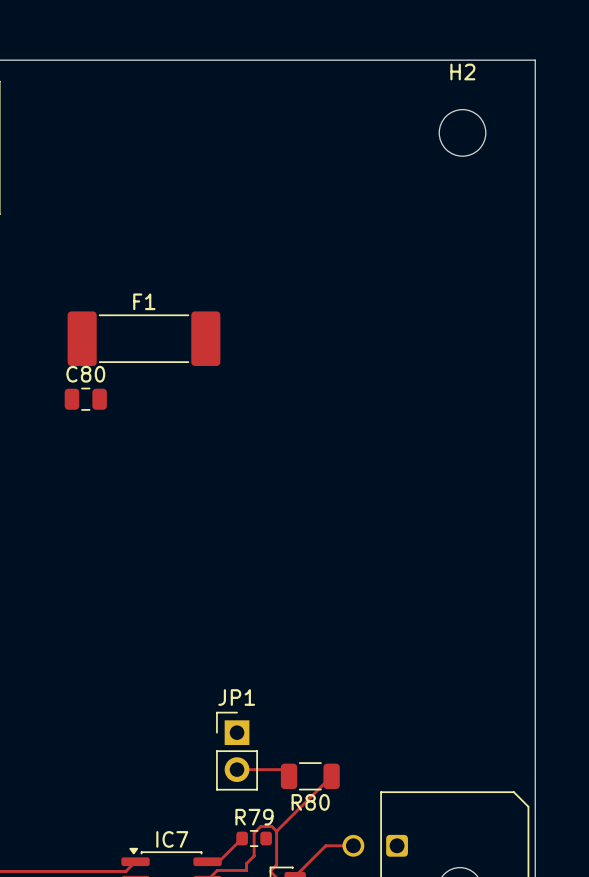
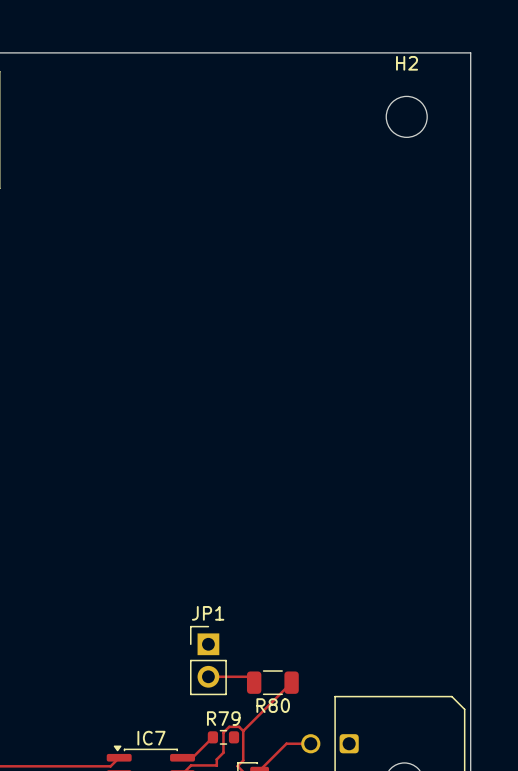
F1: (143, 338) -> none
C80: (85, 399) -> none

